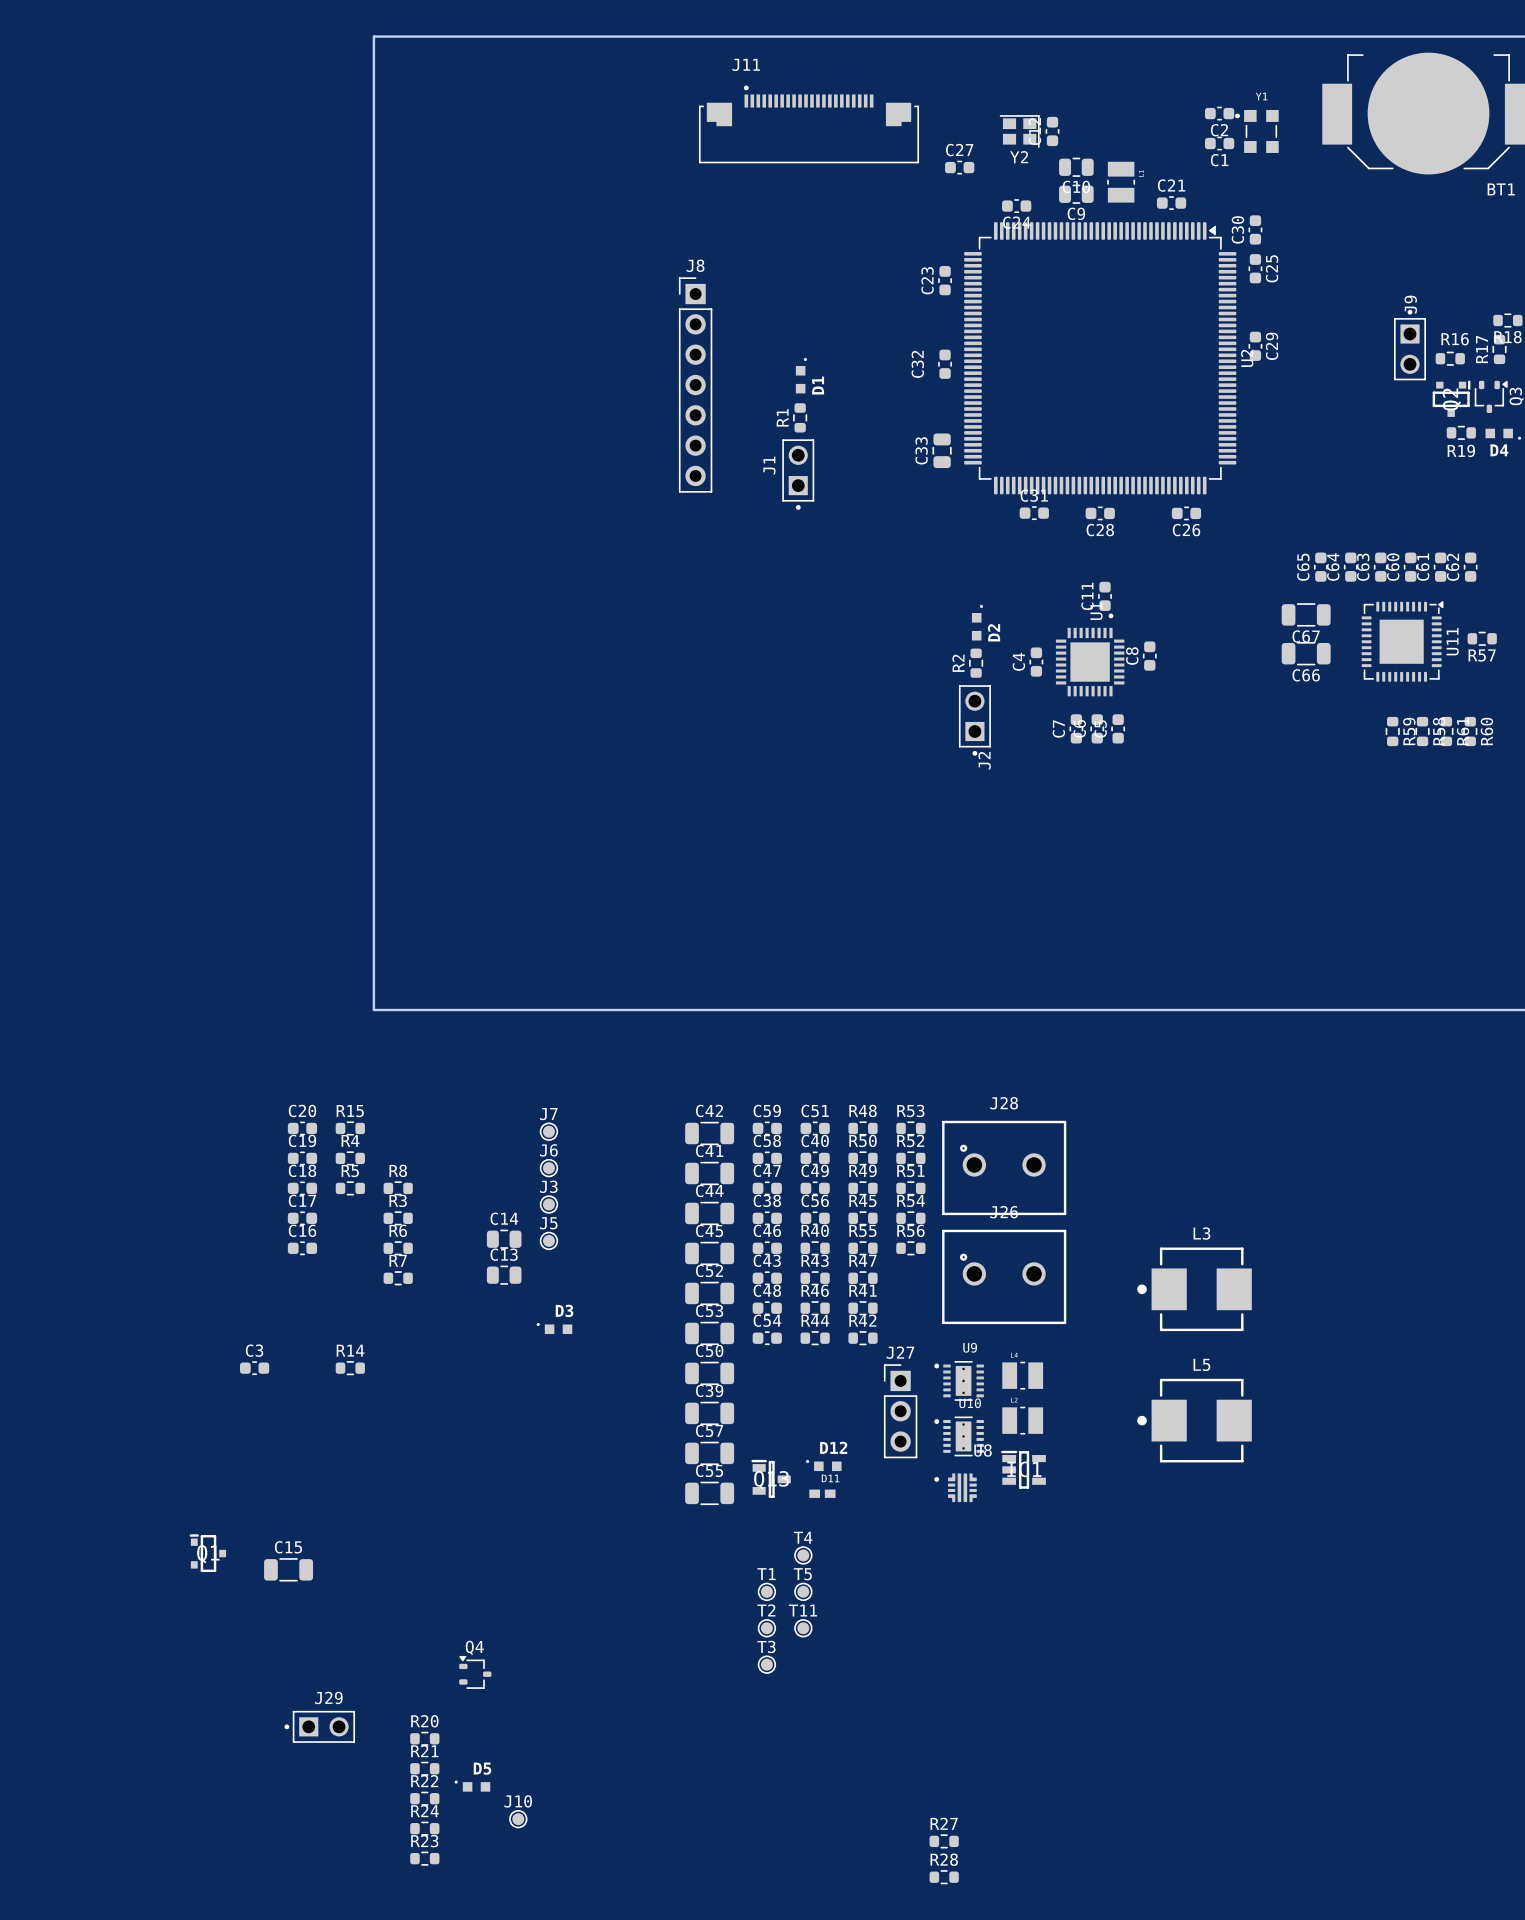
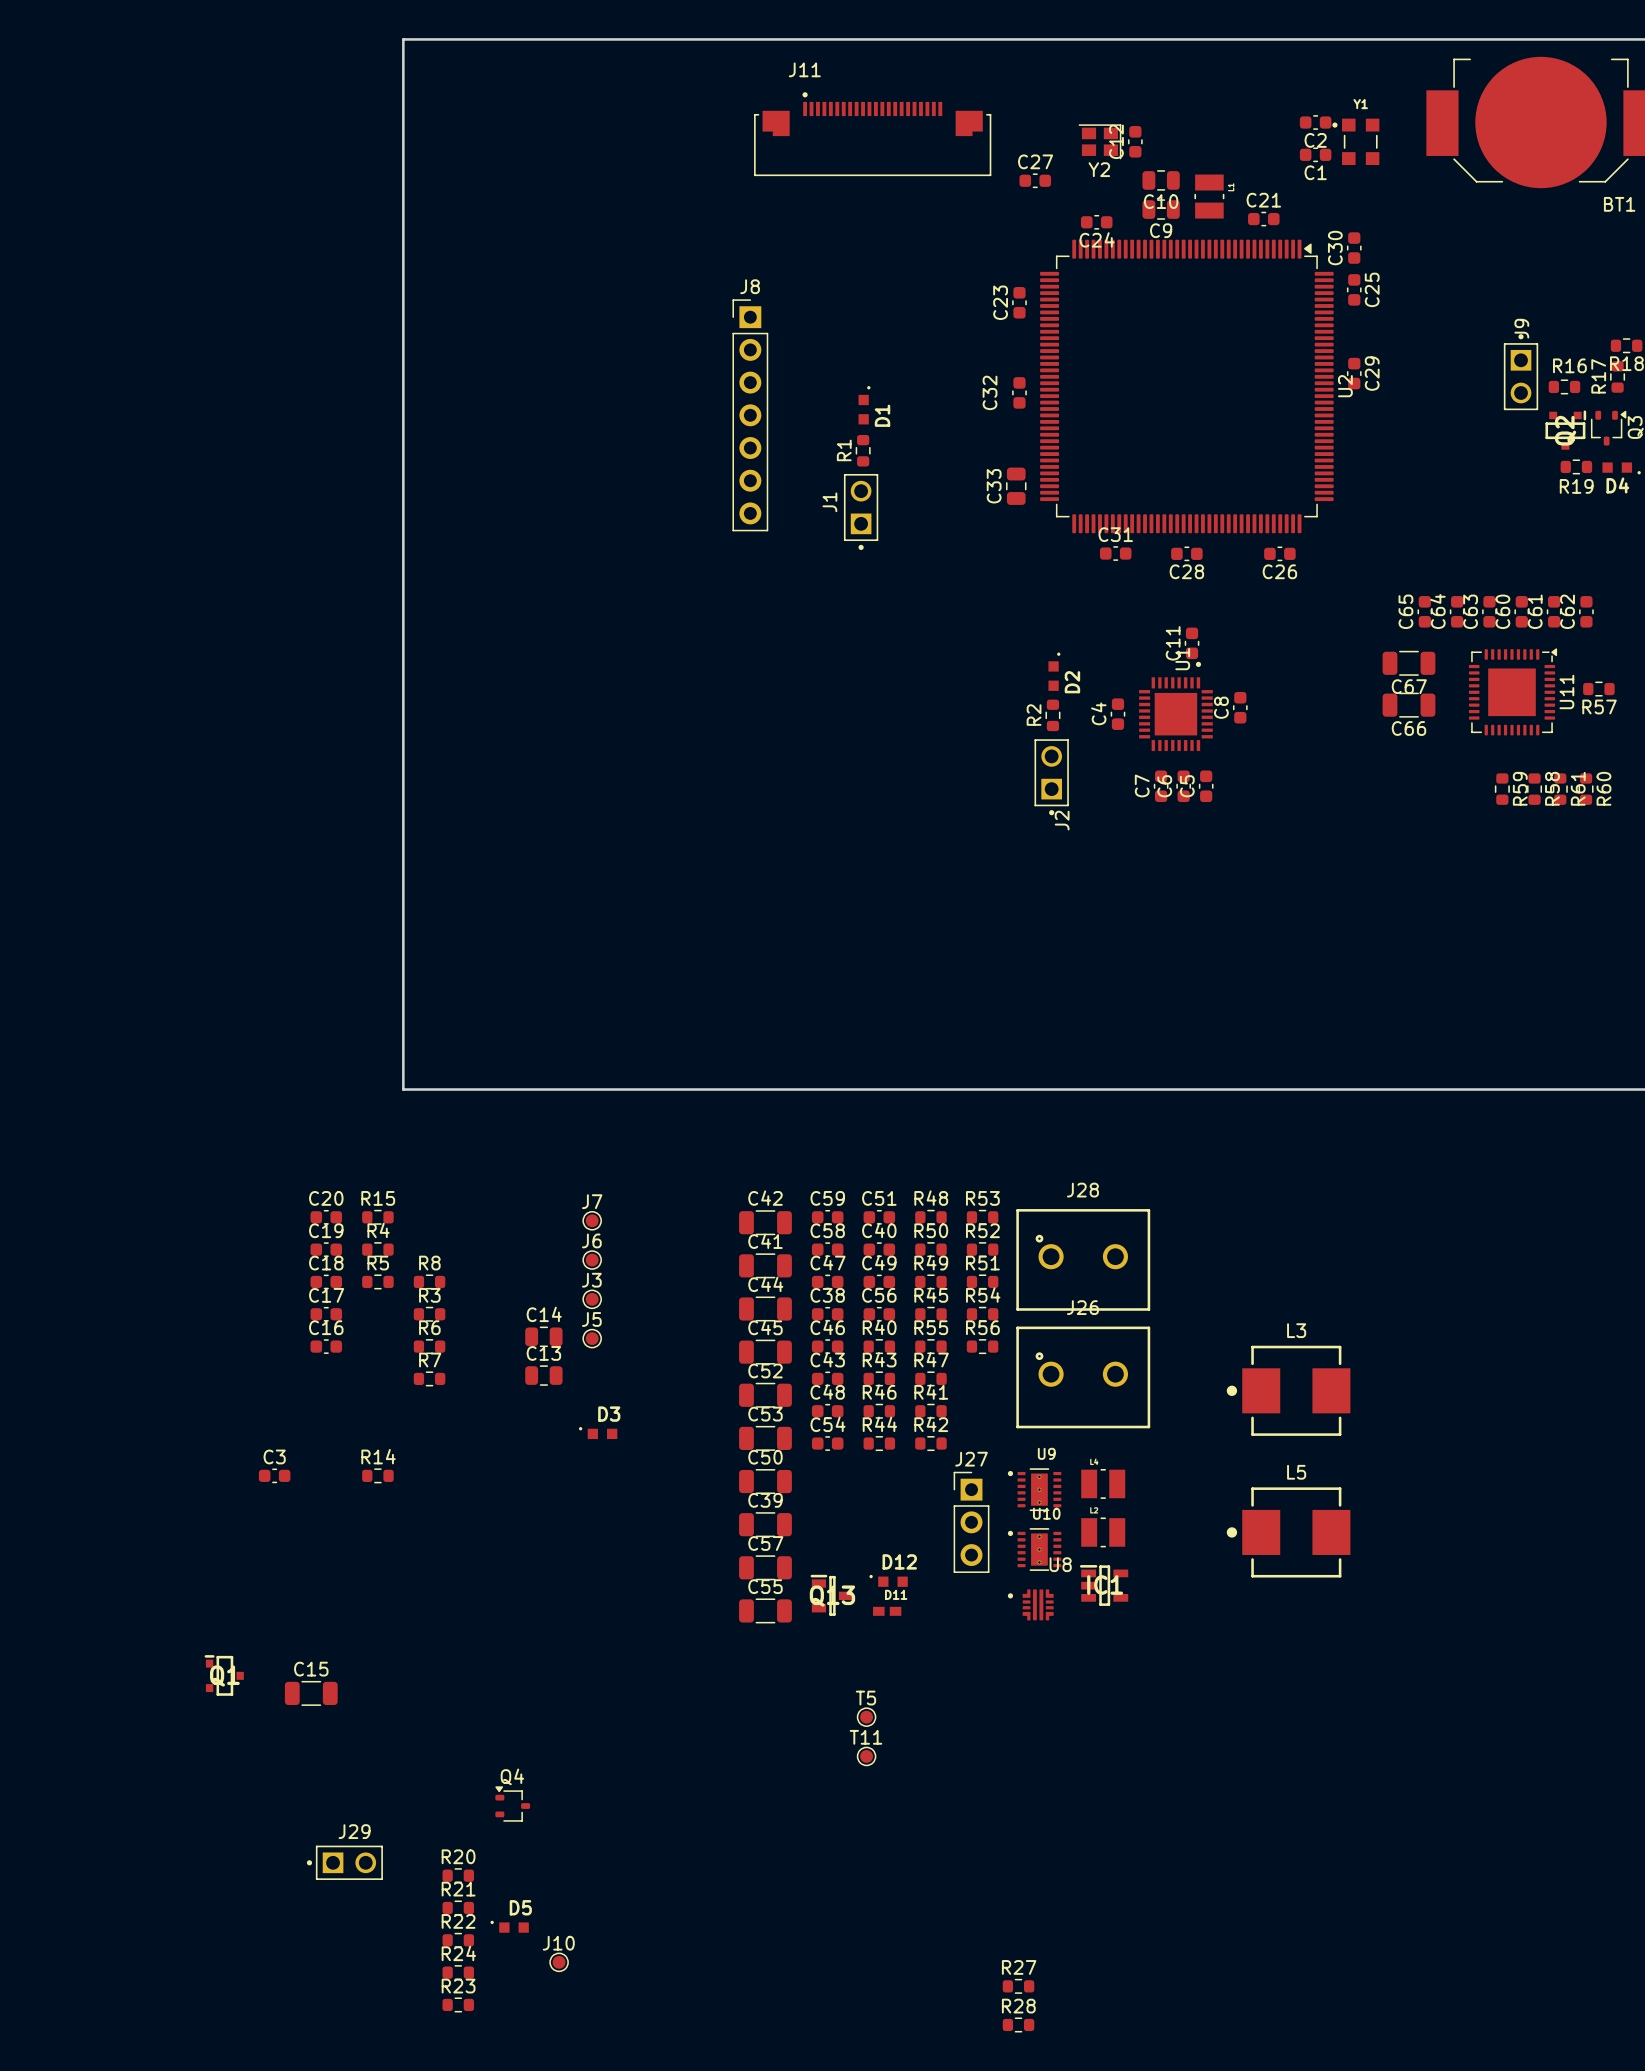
T4: (803, 1555) -> none
T1: (766, 1591) -> none
T2: (766, 1628) -> none
T3: (766, 1664) -> none

